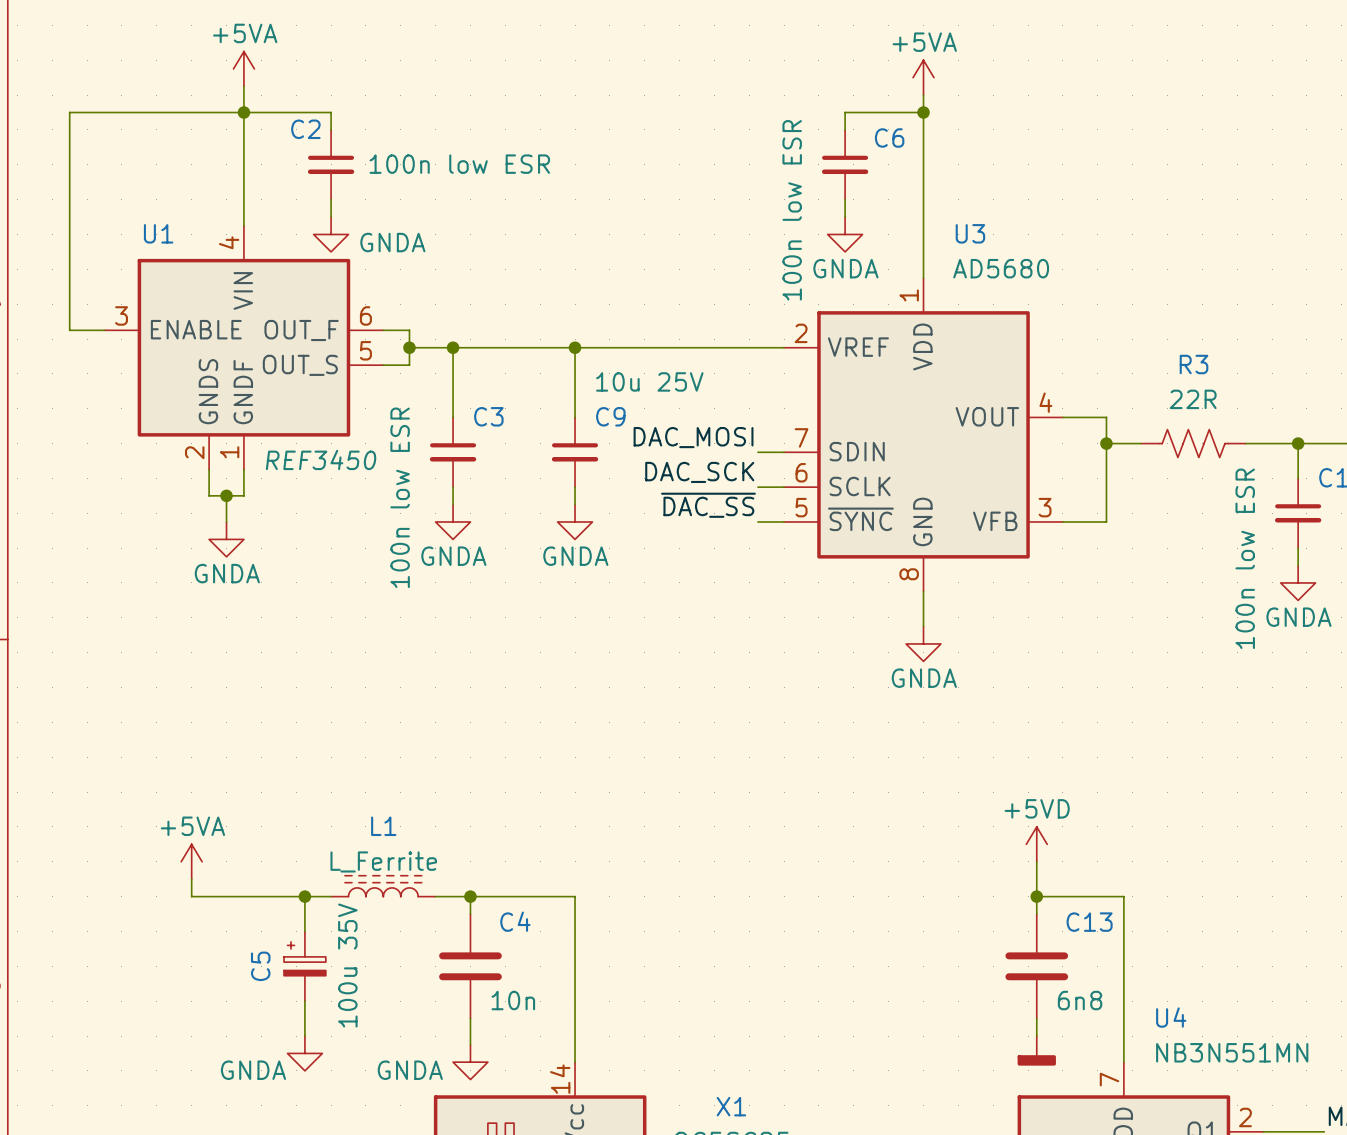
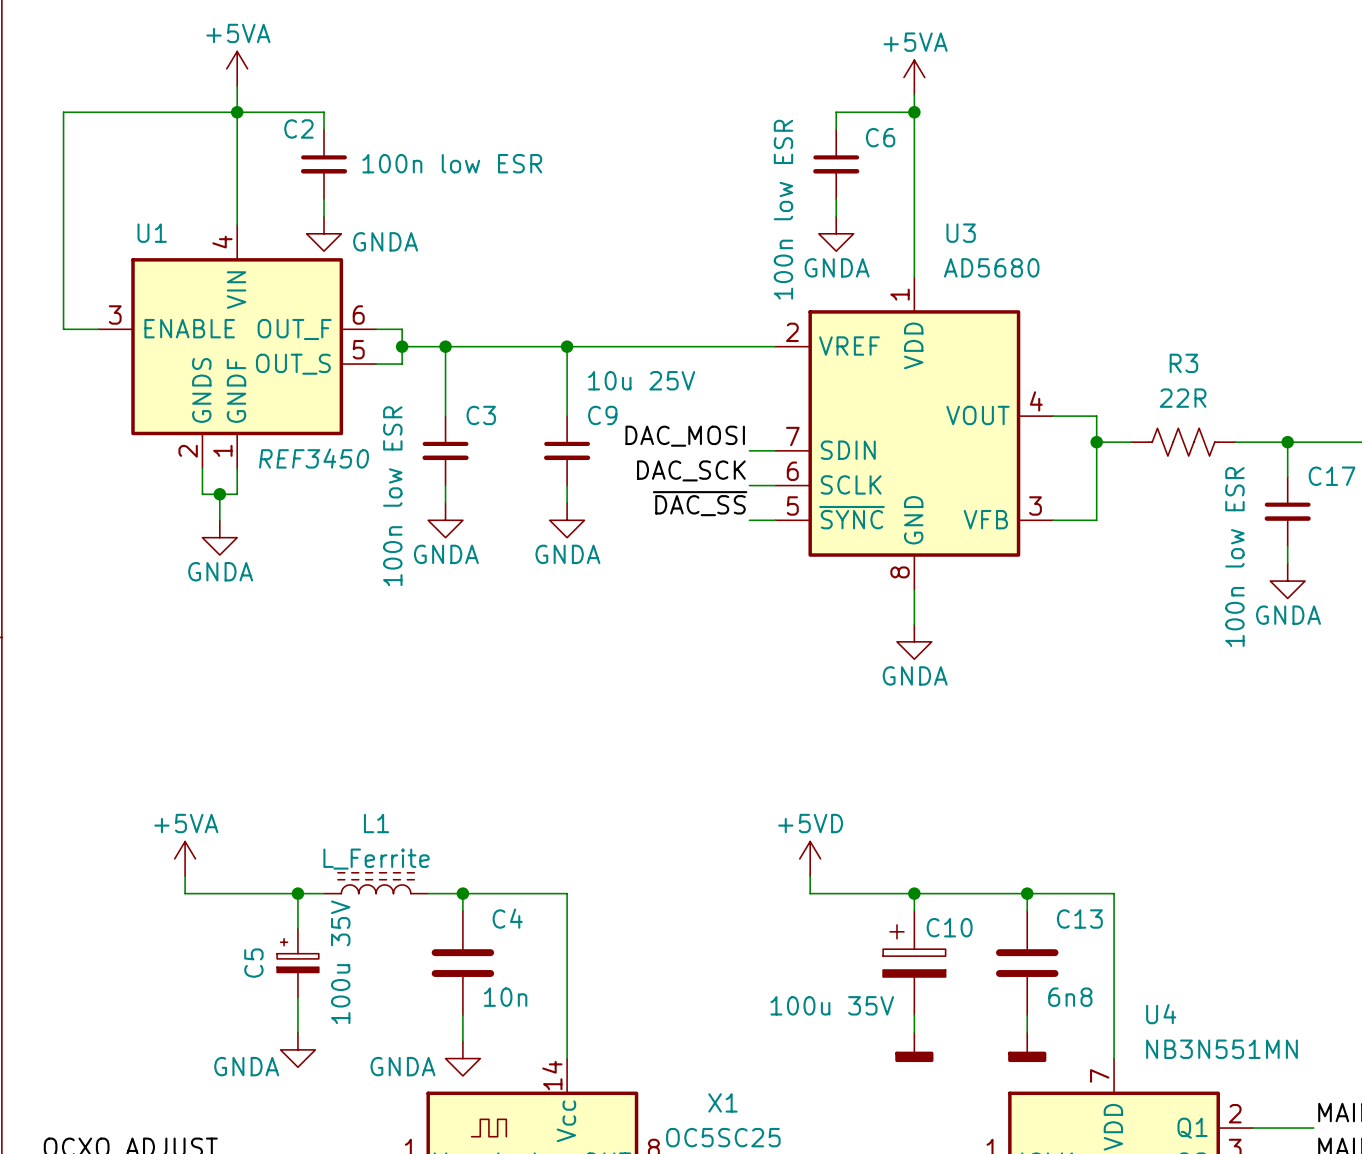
power symbol position: +5VD (1036, 844) -> +5VD (810, 858)
wire: (1036, 861) (1036, 896) -> (810, 876) (810, 893) (1027, 893)
wire: none -> (914, 893) (914, 910)
junction: none -> (914, 893)
C10: none -> 100u 35V (914, 963)
wire: none -> (914, 1015) (914, 1032)
power symbol: none -> (914, 1047)

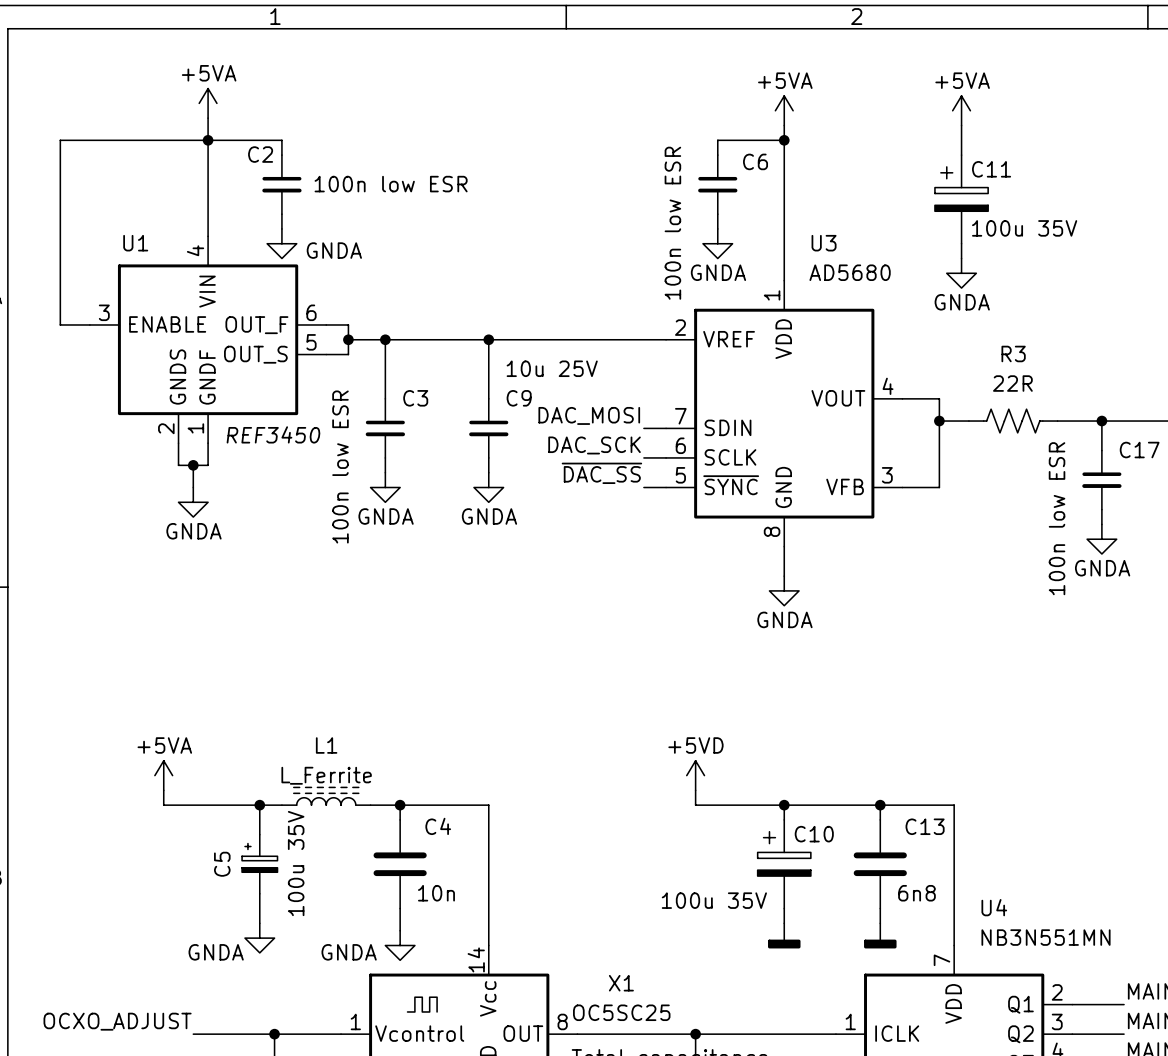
power symbol: none -> +5VA (961, 110)
wire: none -> (961, 125) (961, 155)
C11: none -> 100u 35V (961, 199)
wire: none -> (961, 243) (961, 258)
power symbol: none -> GNDA (961, 273)

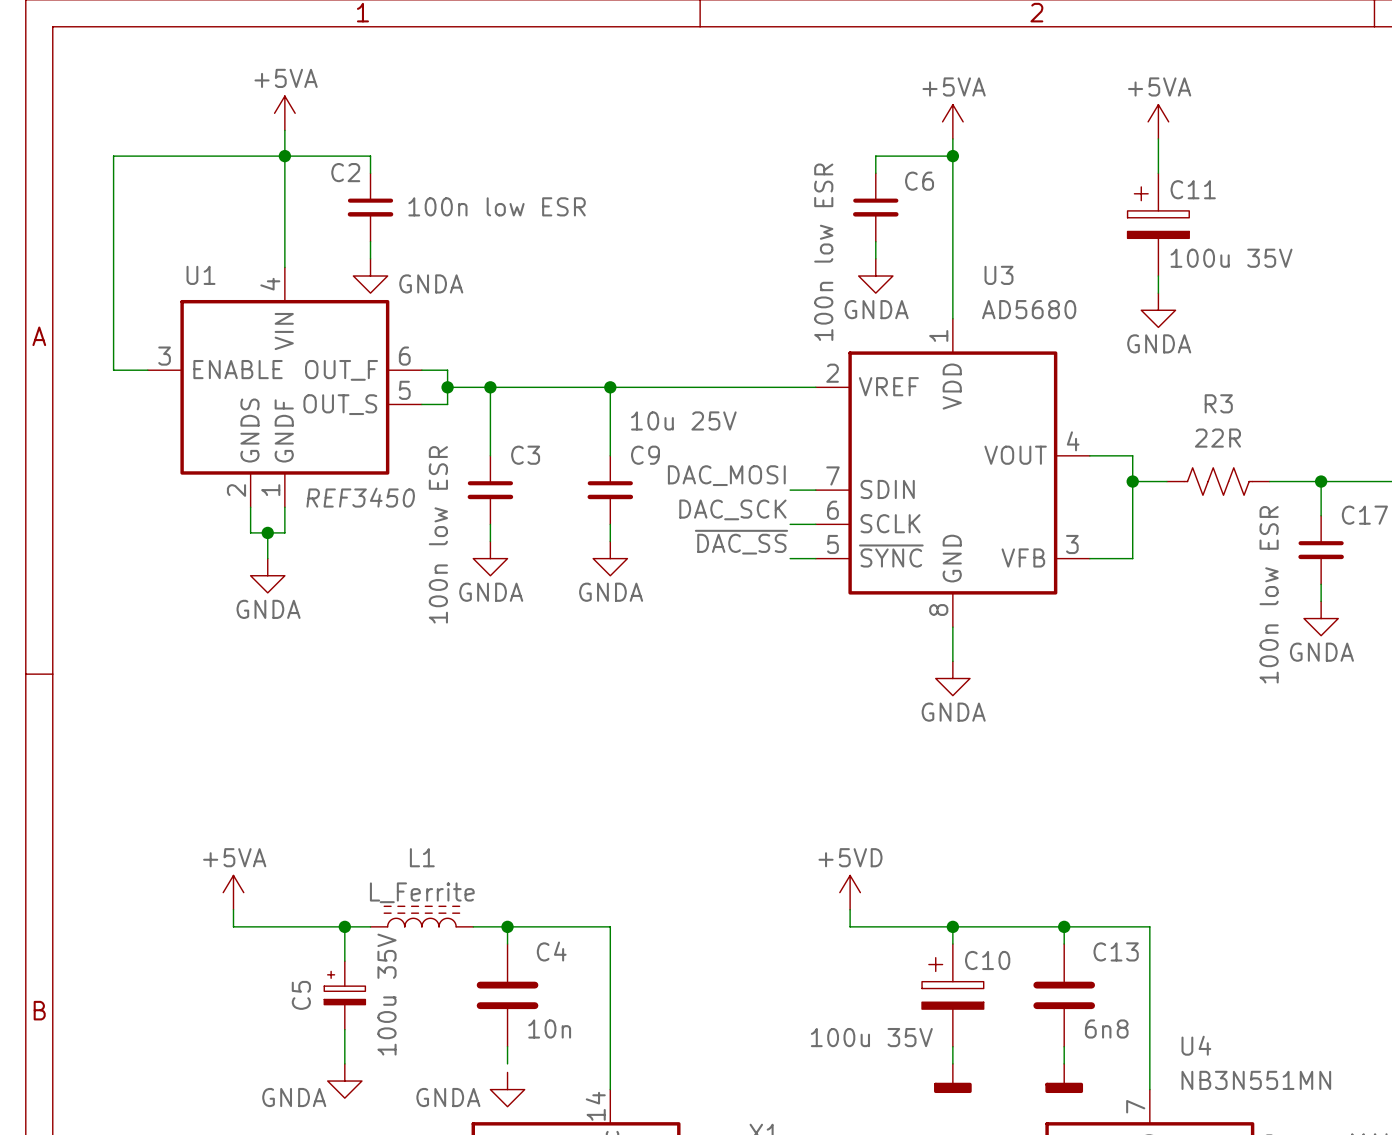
wire: (400, 923) (400, 930) -> none

